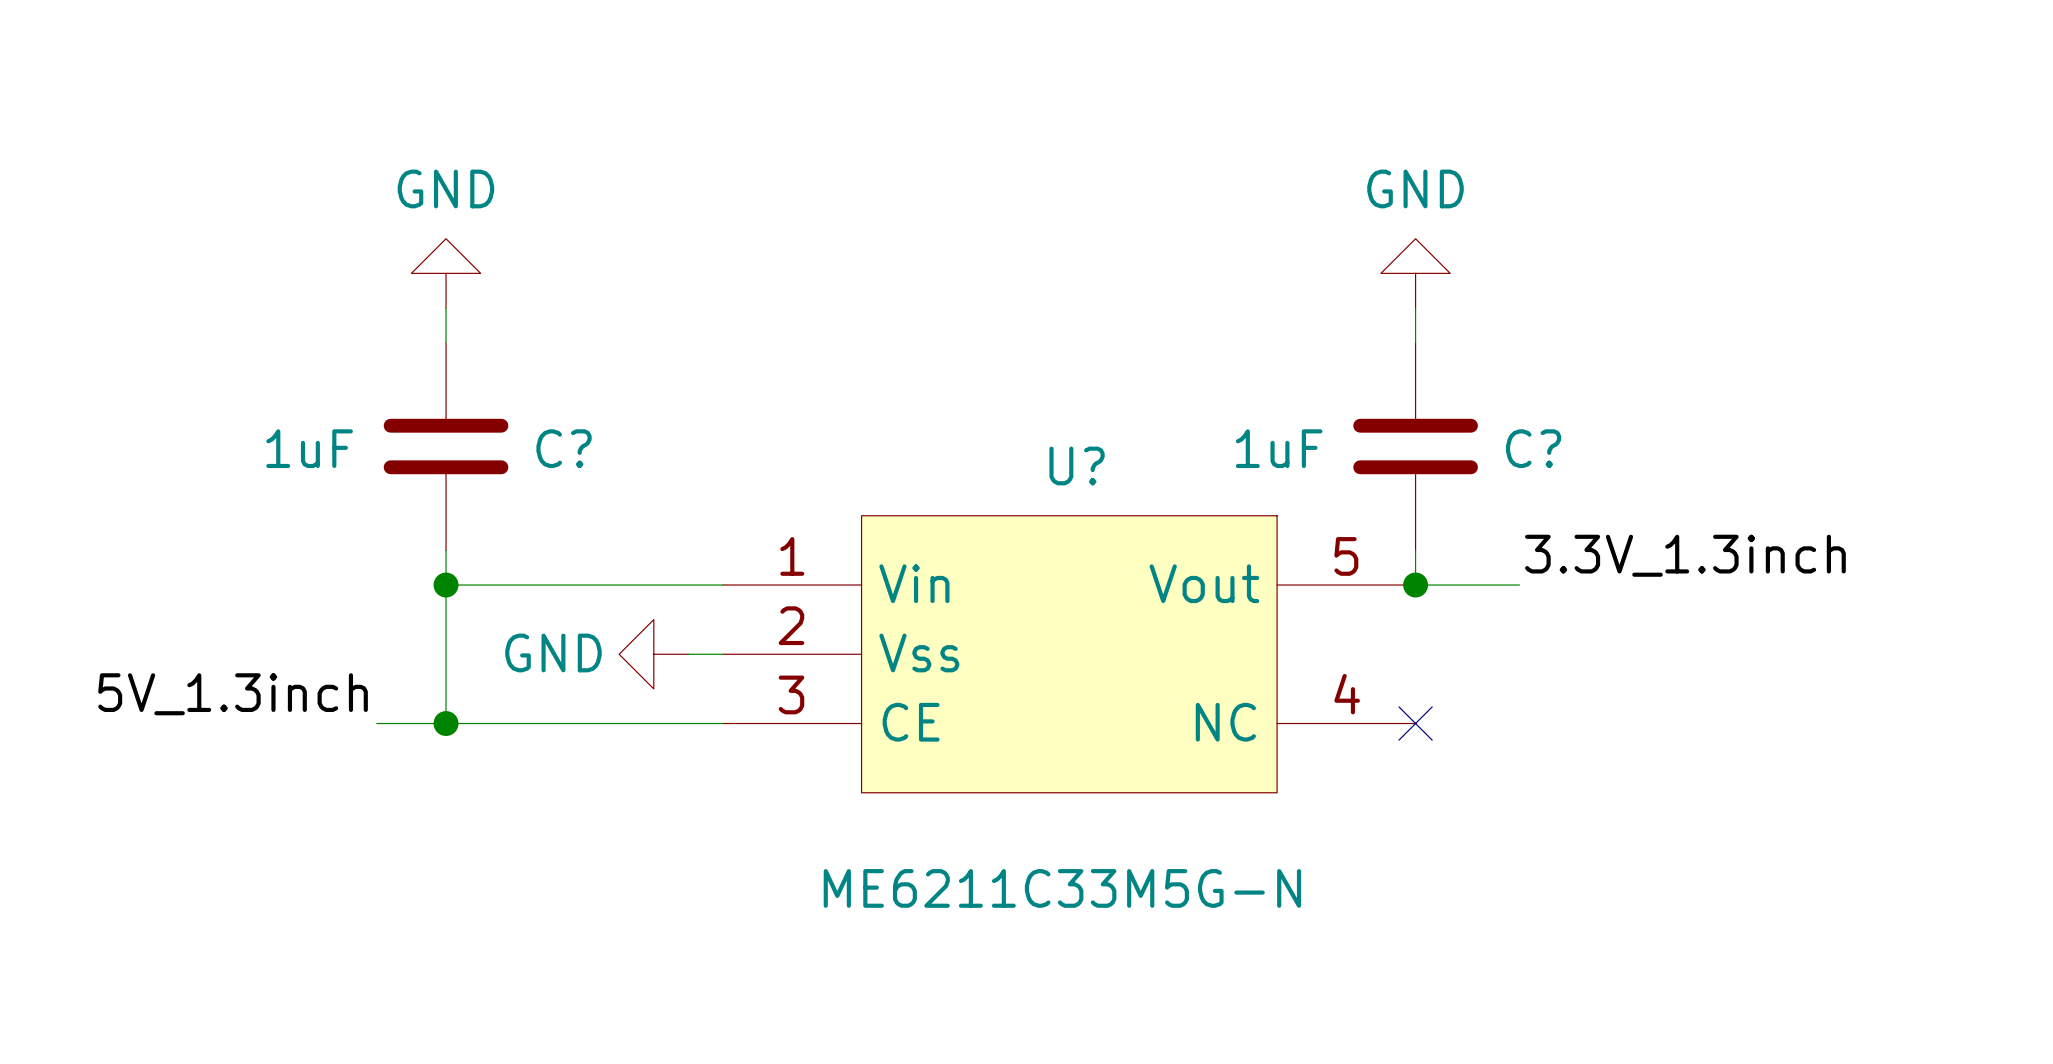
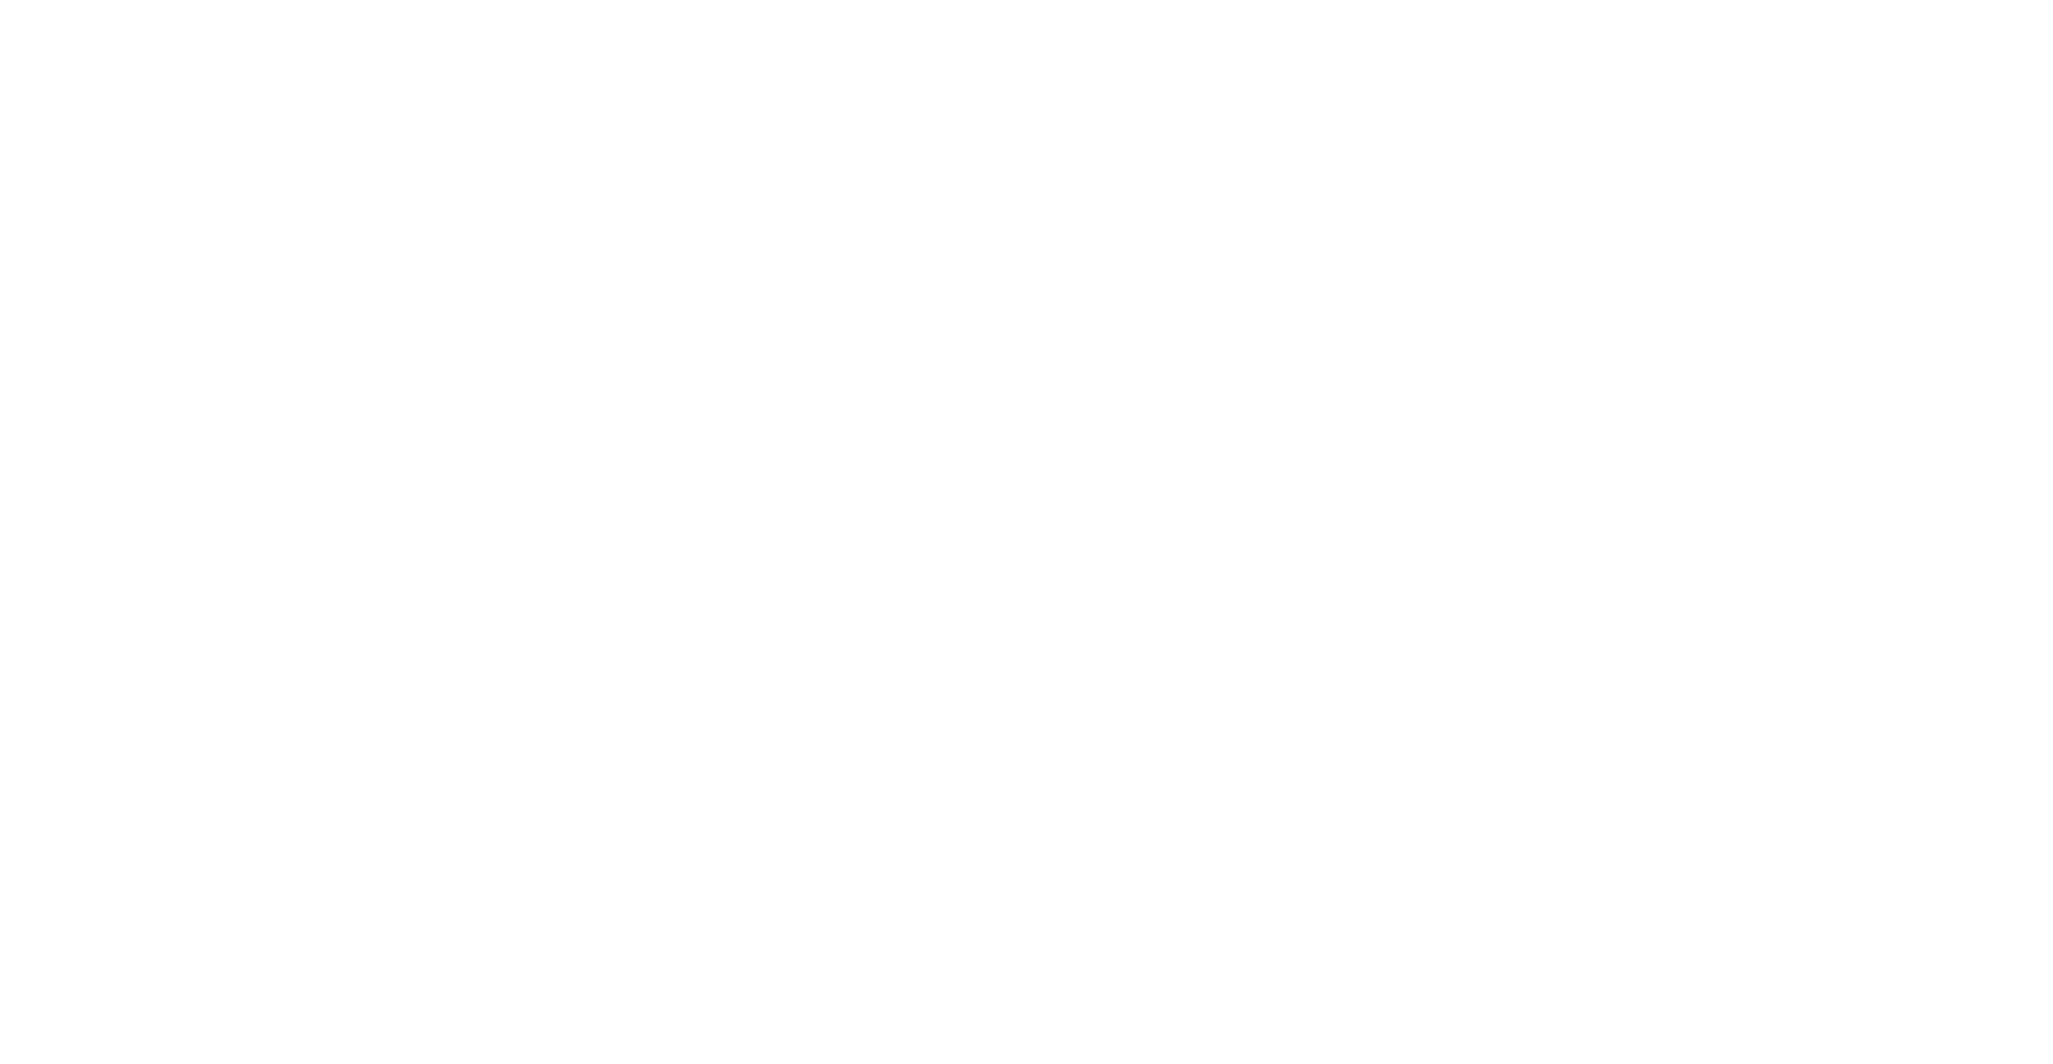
power symbol: GND (446, 273) -> none
power symbol: GND (1415, 273) -> none
wire: (446, 308) (446, 342) -> none
wire: (1415, 308) (1415, 342) -> none
C?: 1uF (446, 446) -> none
C?: 1uF (1415, 446) -> none
wire: (446, 550) (446, 723) -> none
wire: (1415, 550) (1415, 585) (1519, 585) -> none
label: 3.3V_1.3inch (1685, 555) -> none
wire: (446, 585) (723, 585) -> none
junction: (446, 585) -> none
junction: (1415, 585) -> none
power symbol: GND (653, 654) -> none
wire: (688, 654) (723, 654) -> none
U?: ME6211C33M5G-N (1069, 654) -> none
label: 5V_1.3inch (233, 694) -> none
wire: (376, 723) (723, 723) -> none
junction: (446, 723) -> none
no-connect mark: (1415, 723) -> none

